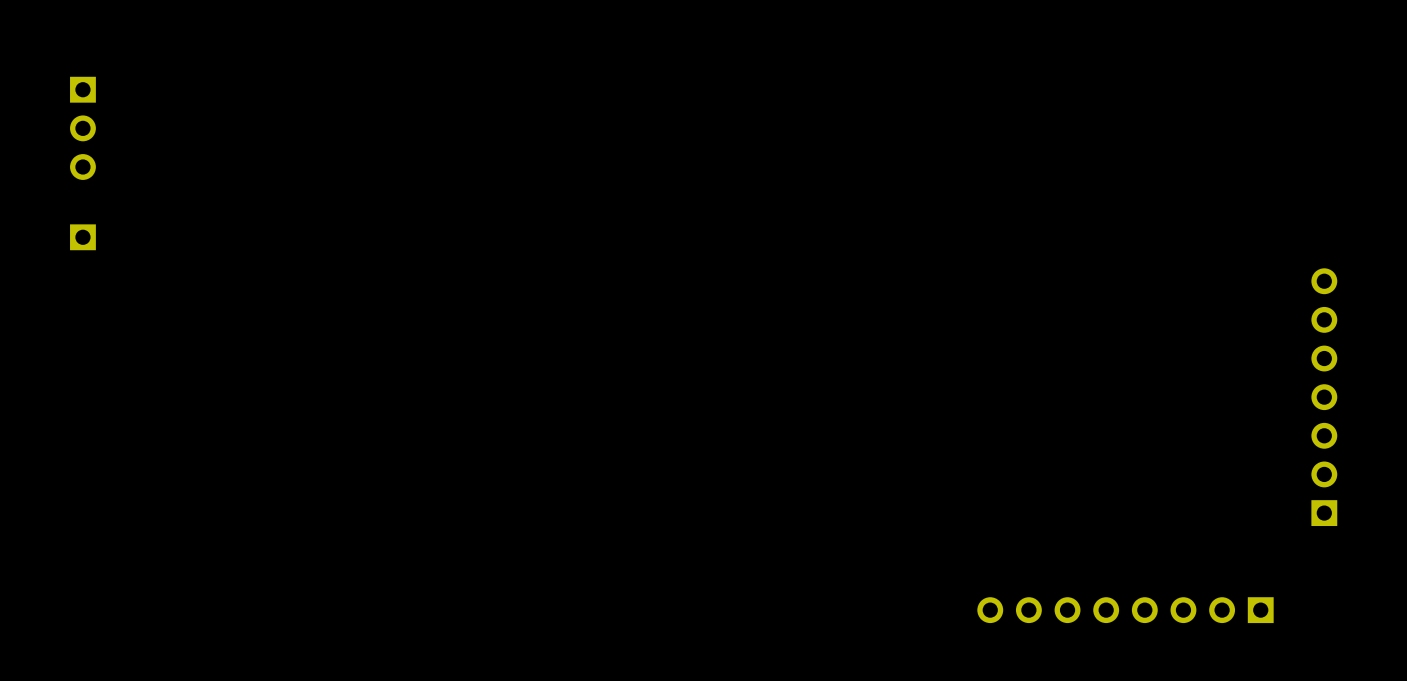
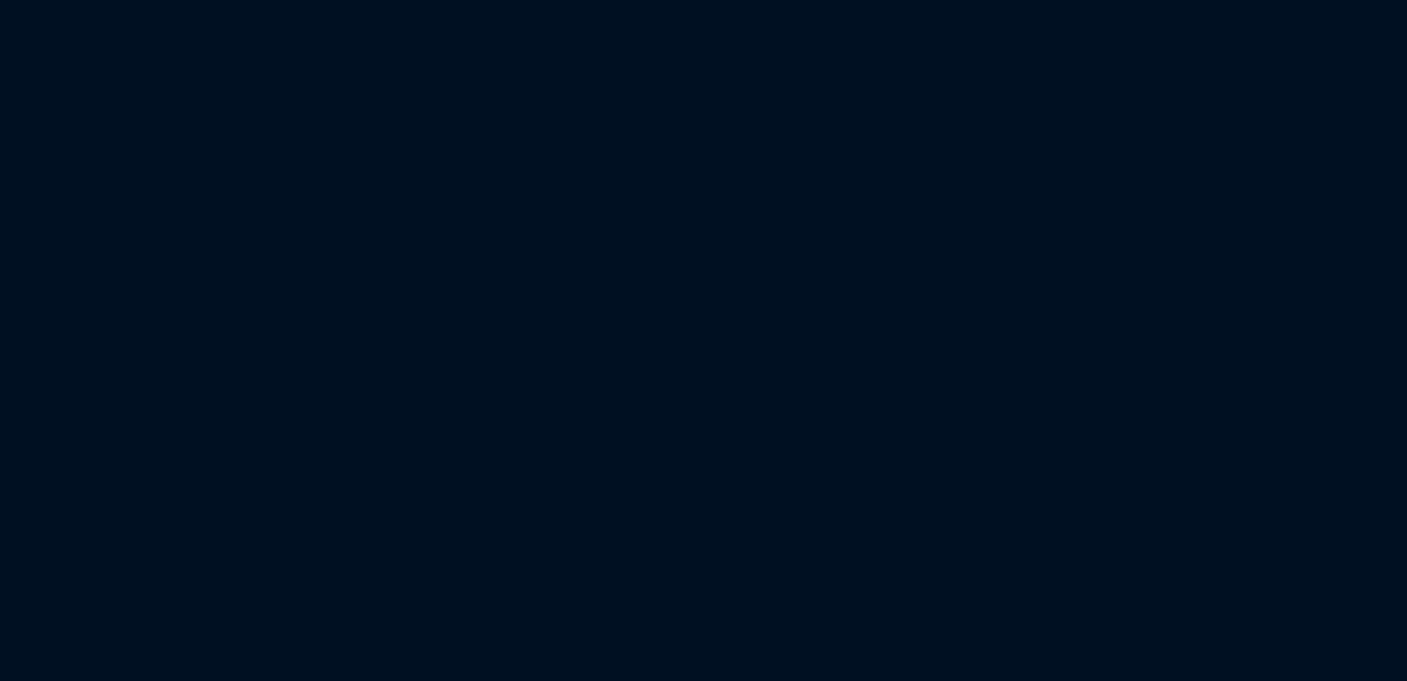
part: (82, 128) -> none
part: (82, 237) -> none
part: (1324, 397) -> none
part: (1125, 610) -> none

